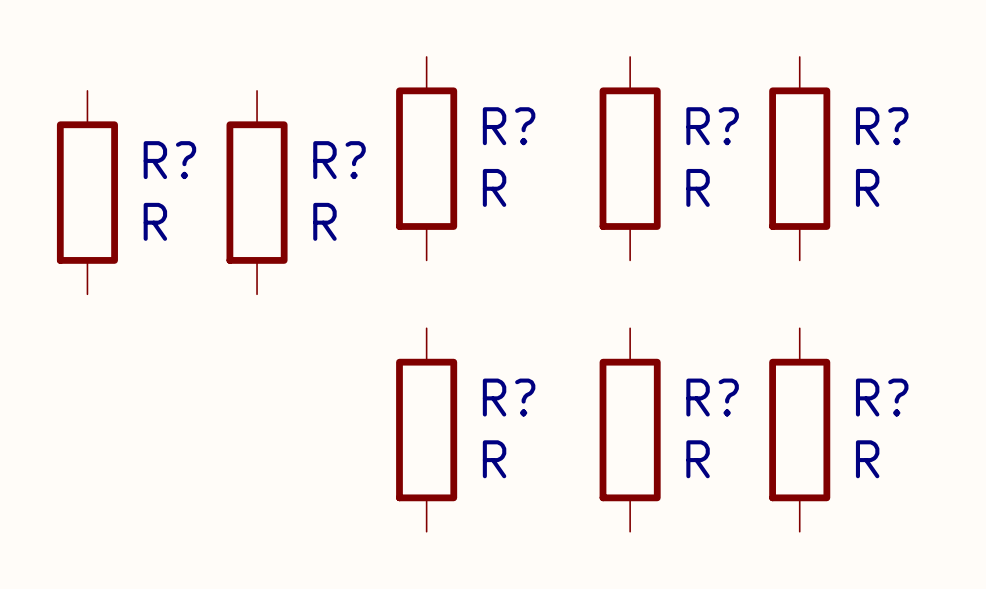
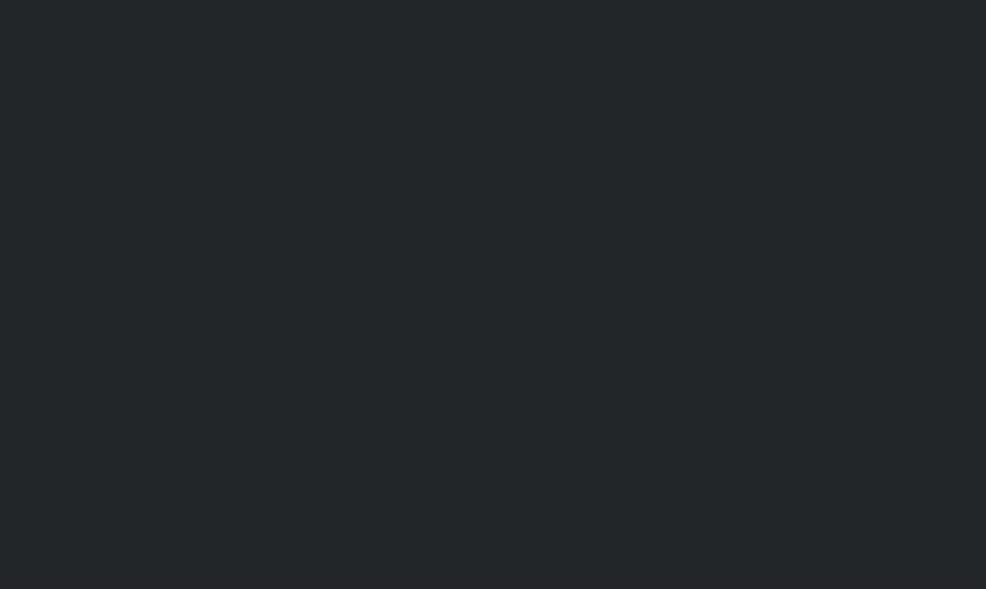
R?: R (426, 158) -> none
R?: R (630, 158) -> none
R?: R (799, 158) -> none
R?: R (87, 192) -> none
R?: R (257, 192) -> none
R?: R (426, 430) -> none
R?: R (630, 430) -> none
R?: R (799, 430) -> none

